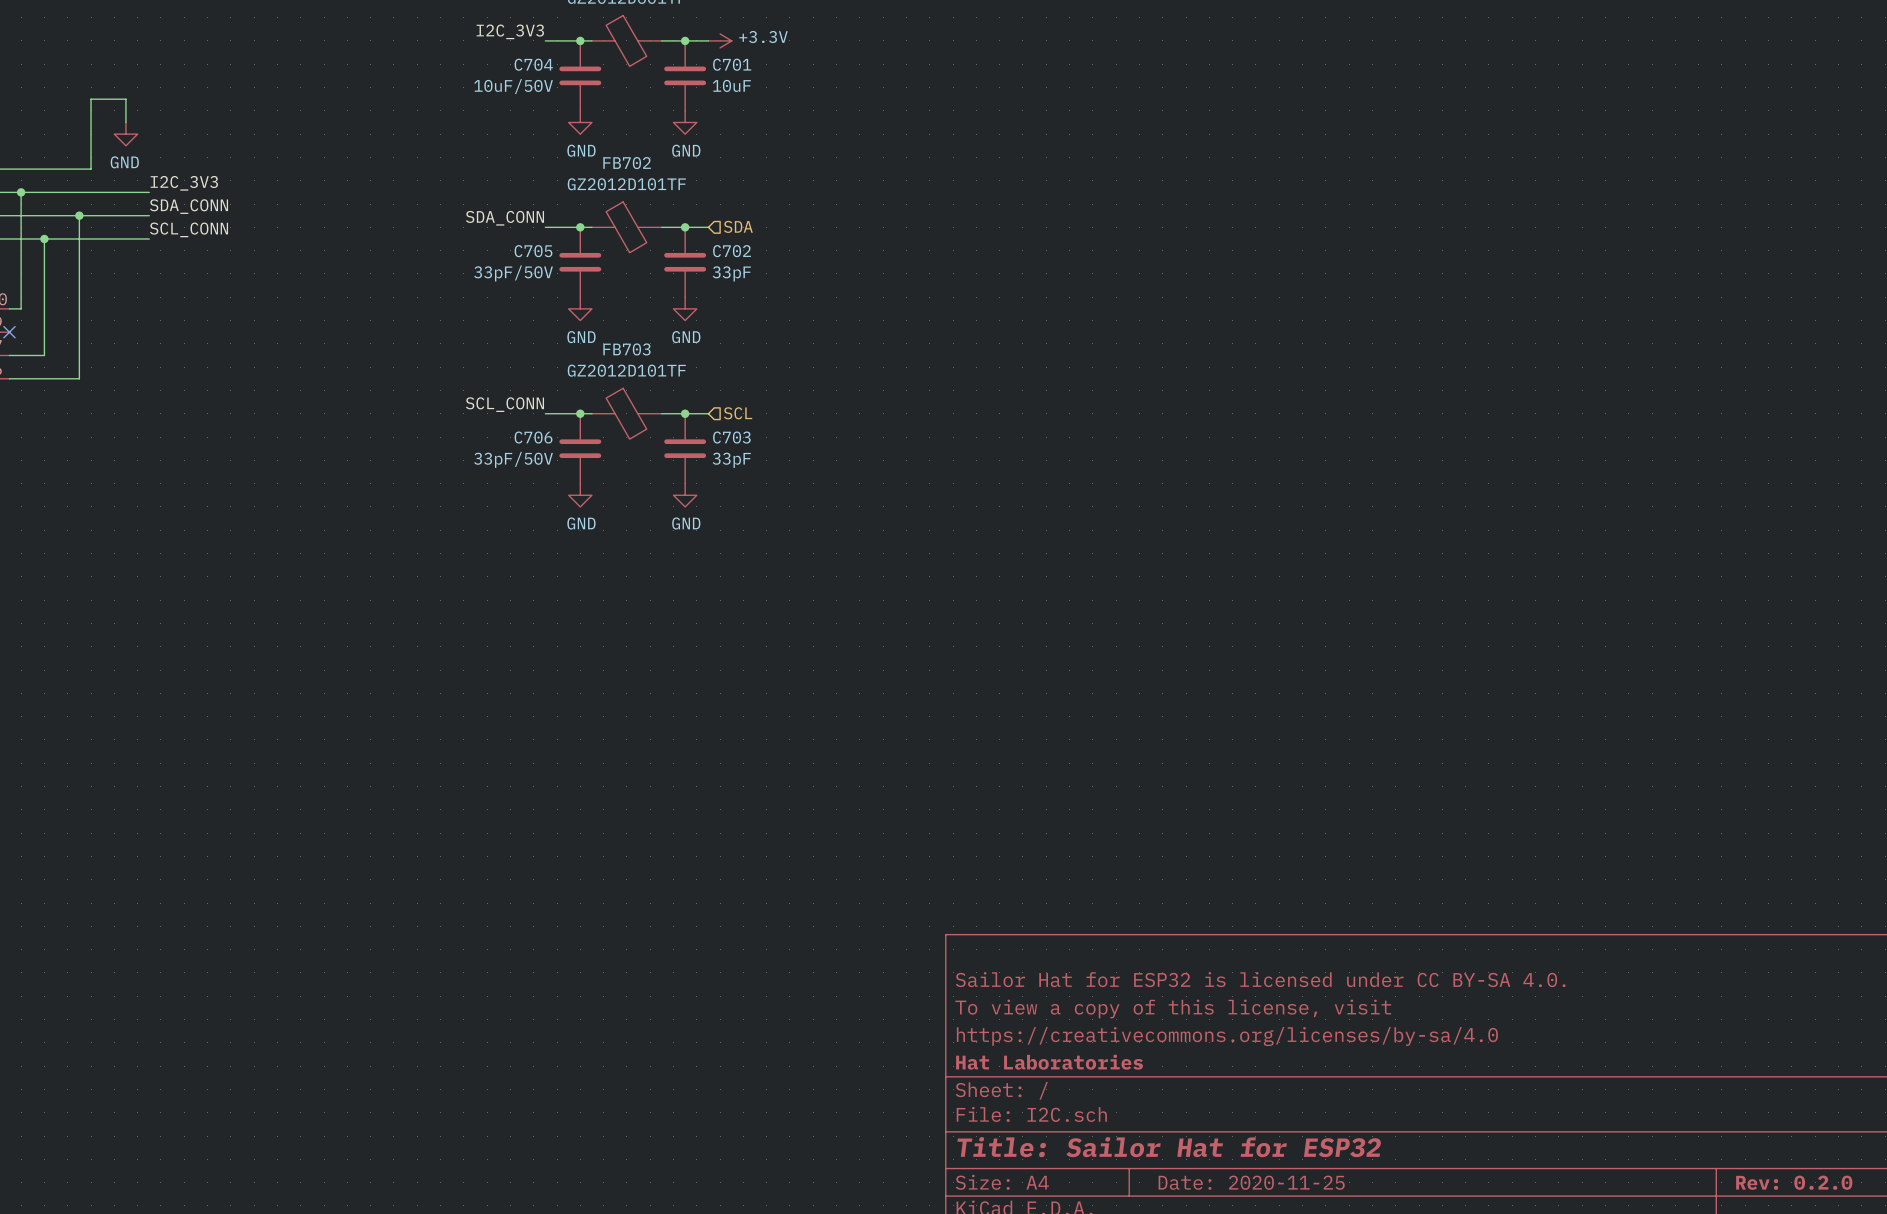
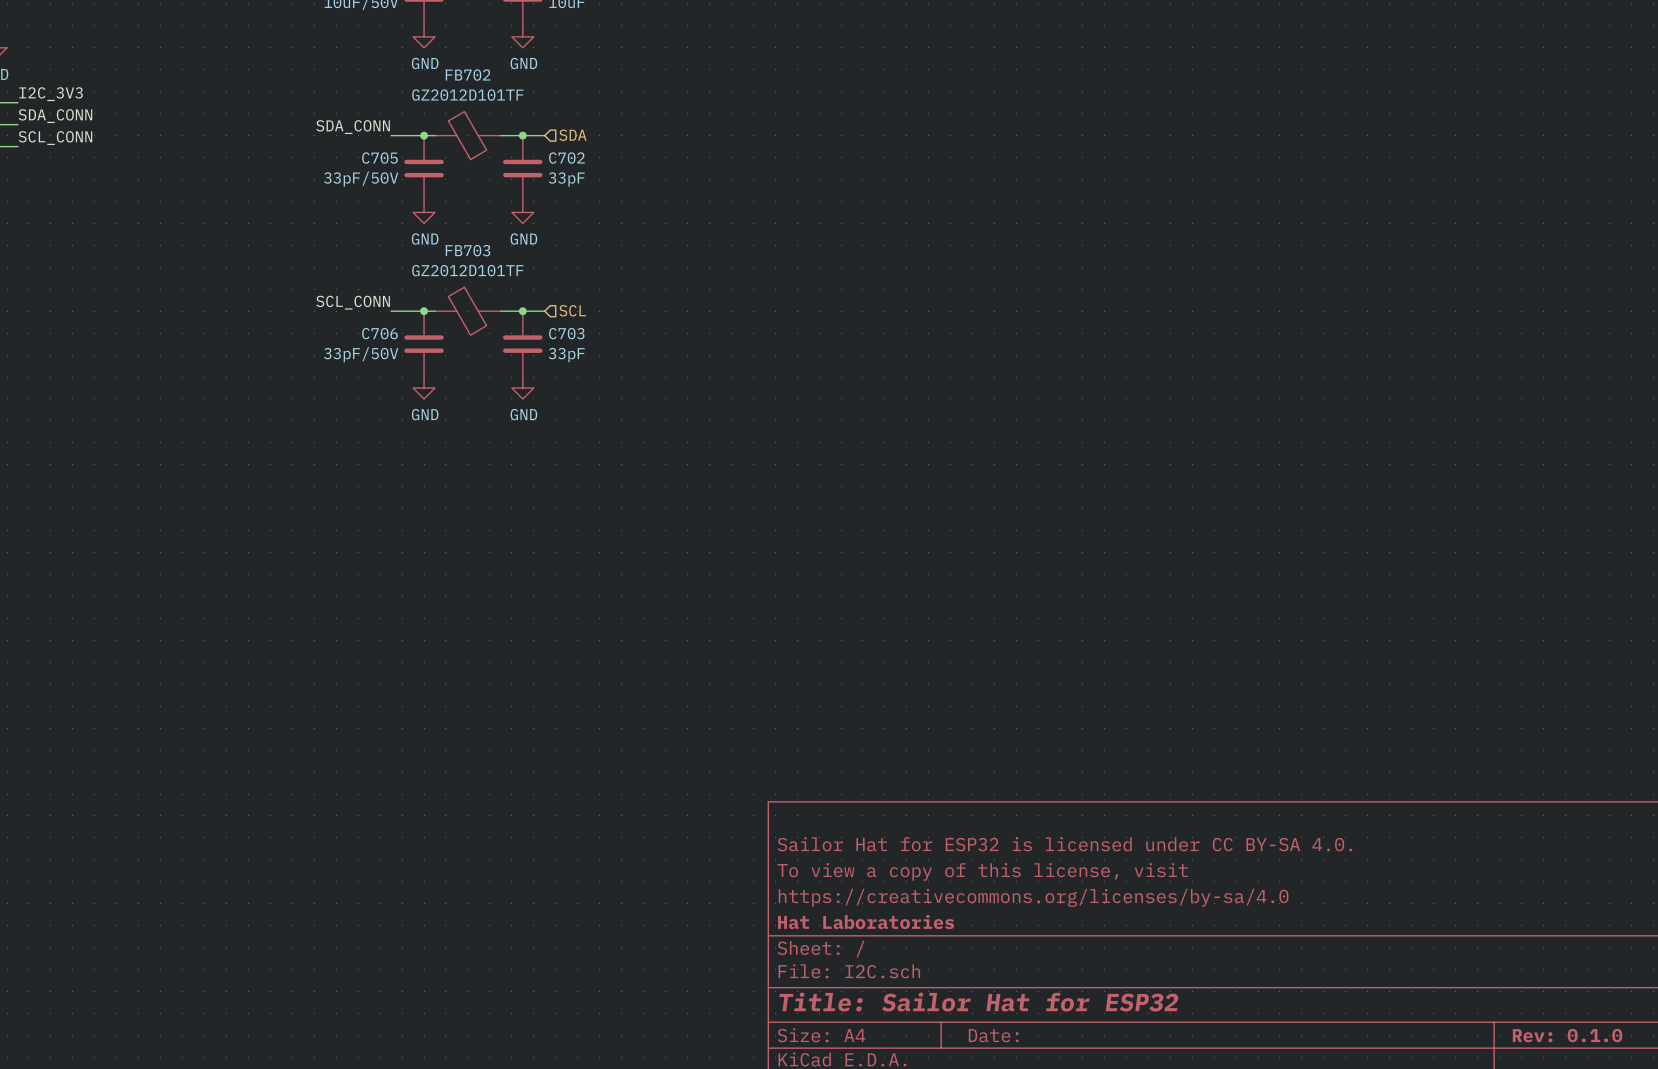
title block: Date: 2020-11-25 (1251, 1182) -> Date: (993, 1035)
title block: Rev: 0.2.0 (1794, 1182) -> Rev: 0.1.0 (1567, 1035)

